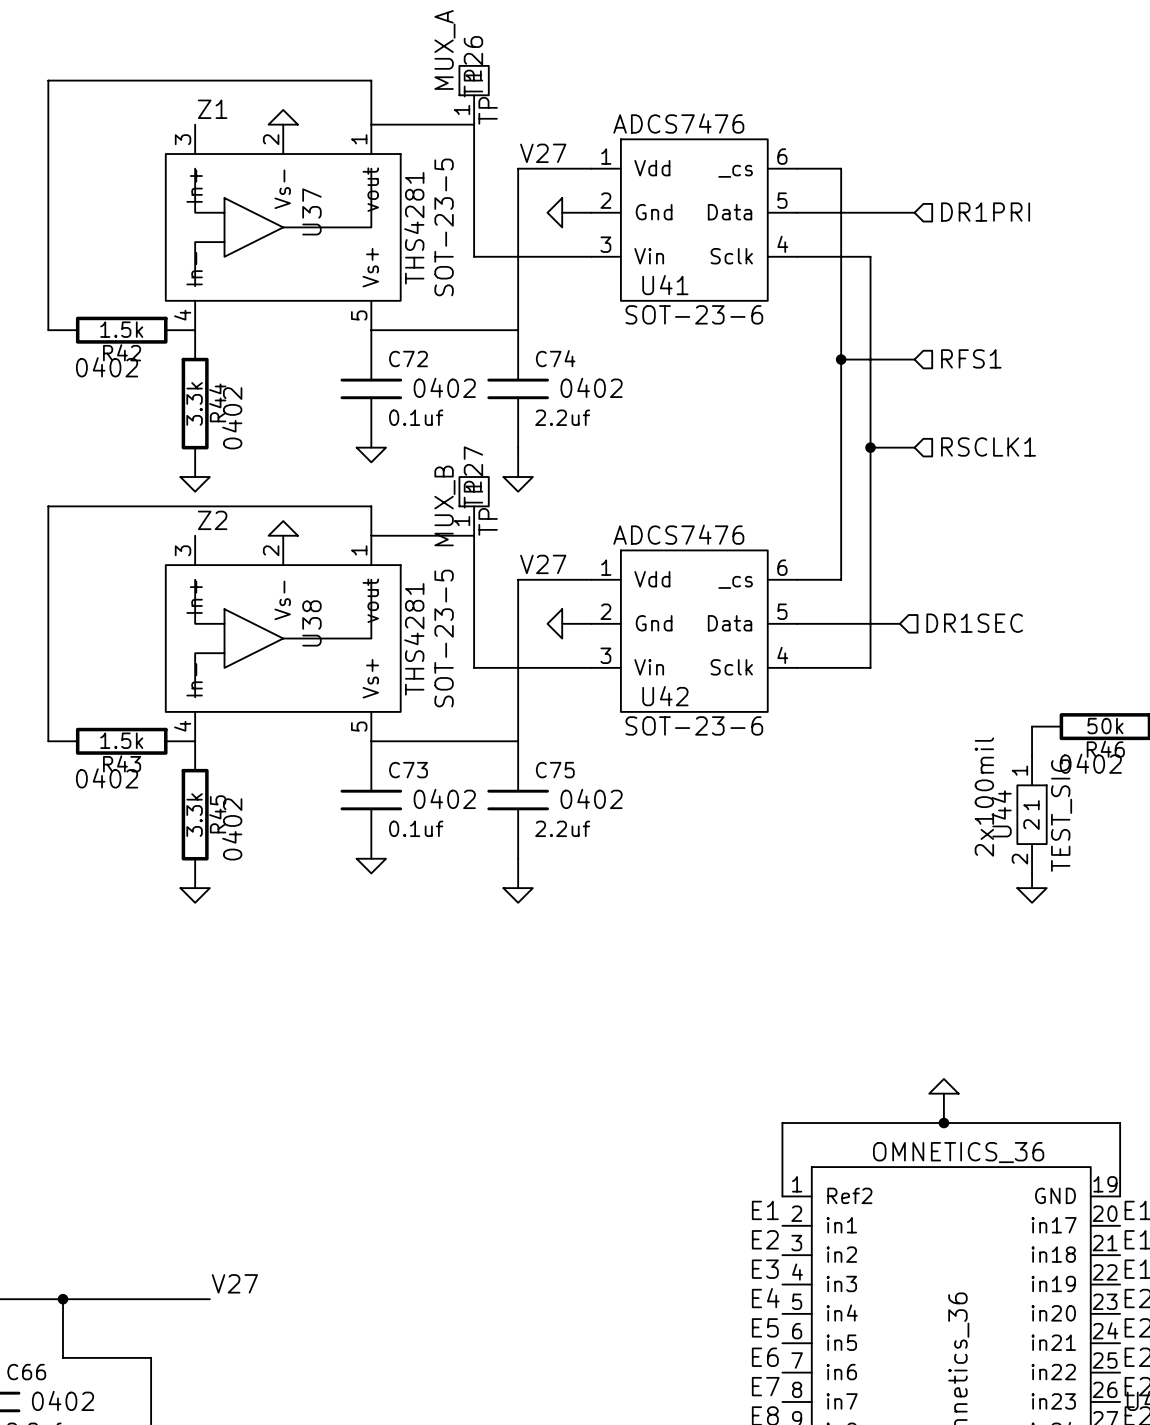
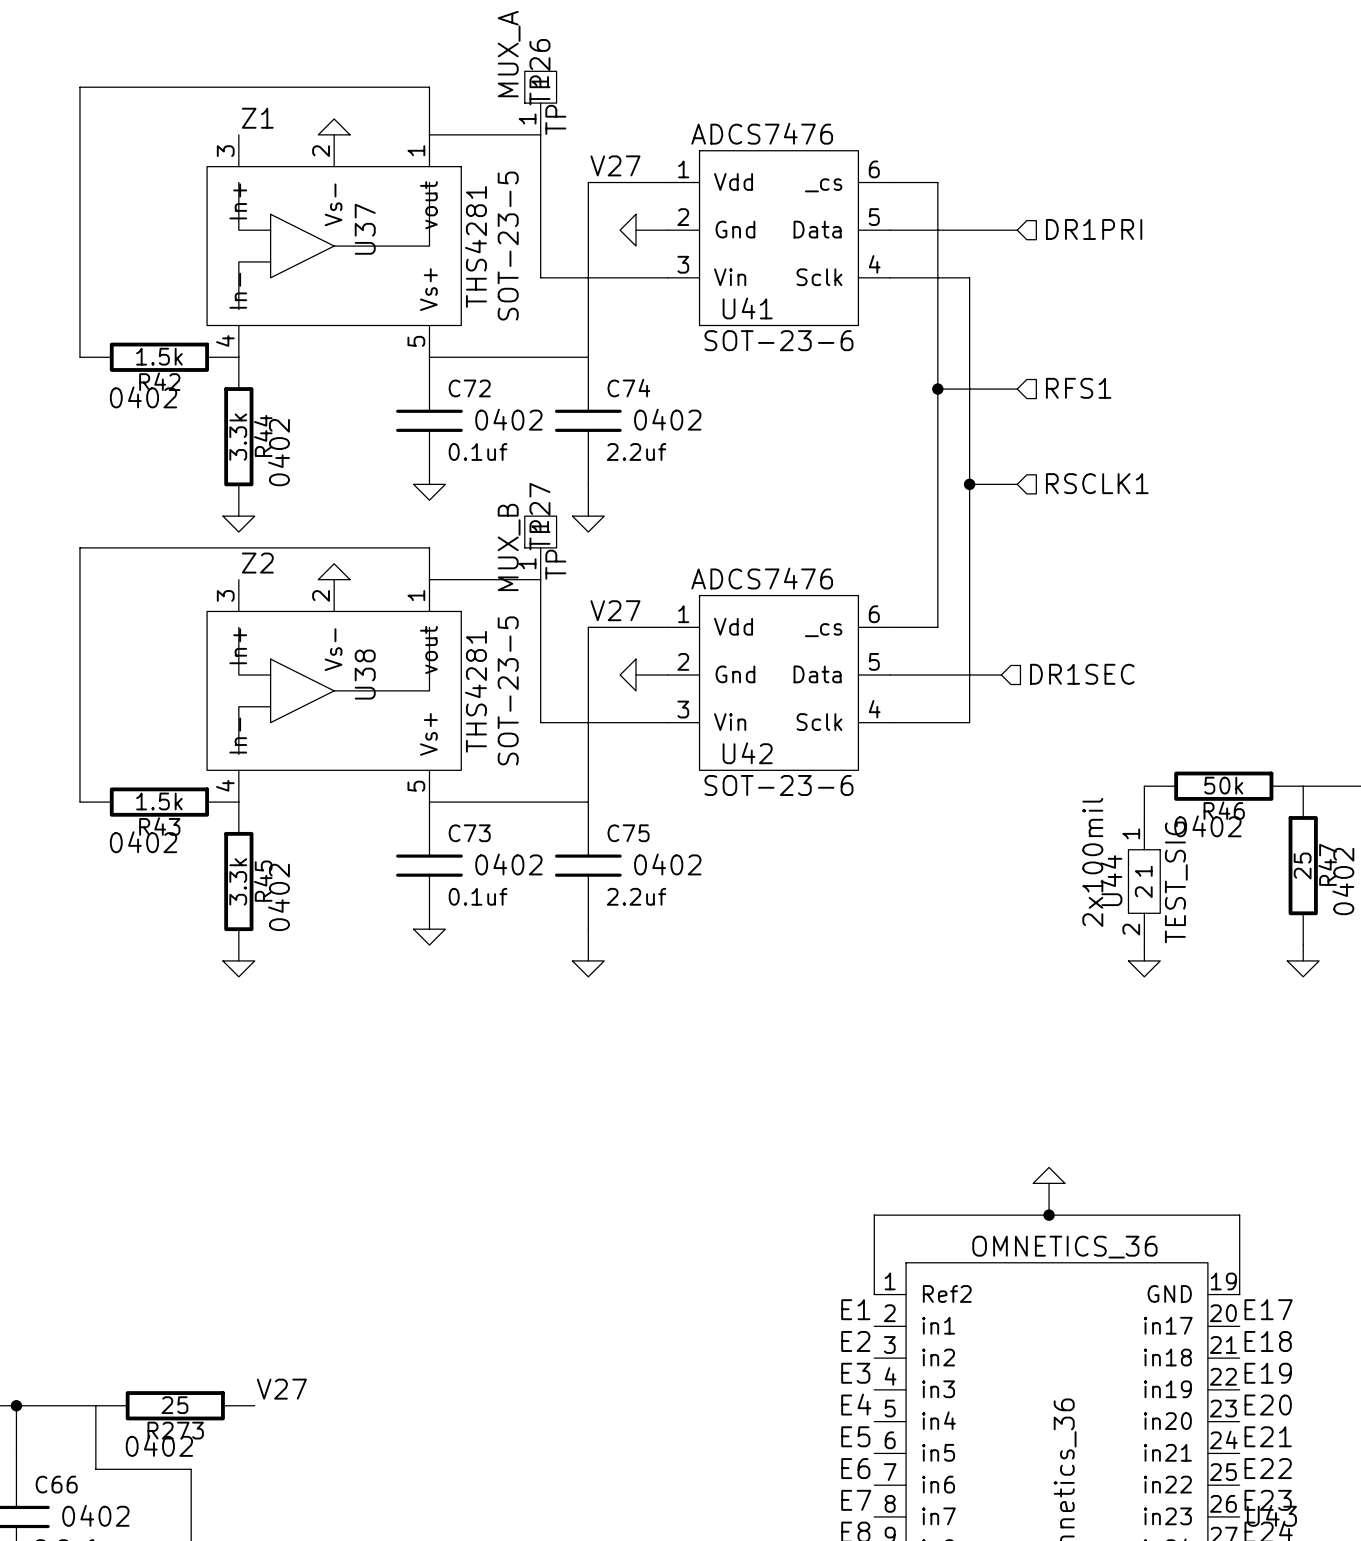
wire: (63, 1299) (209, 1299) -> none
junction: (63, 1299) -> none
R273: none -> 25 (175, 1405)

